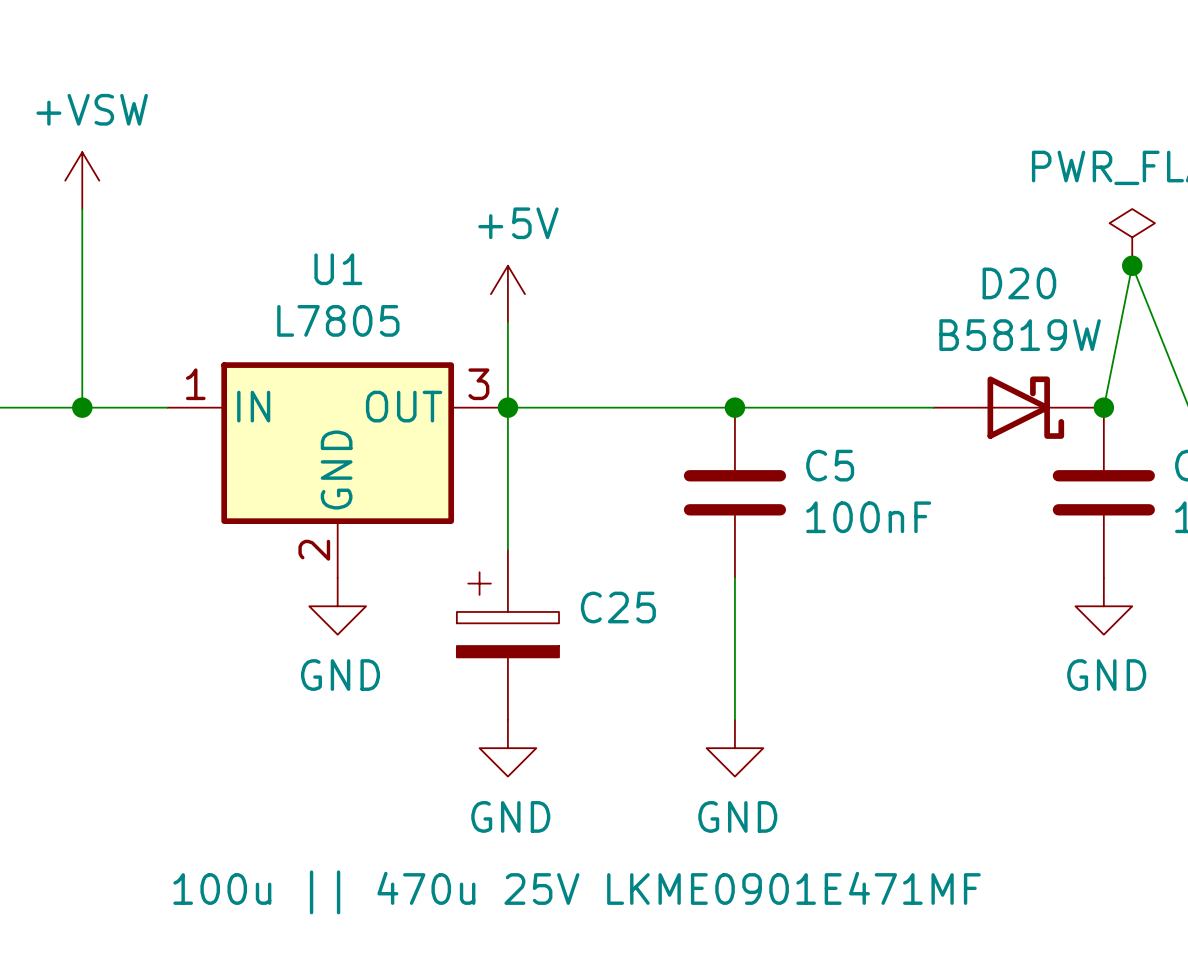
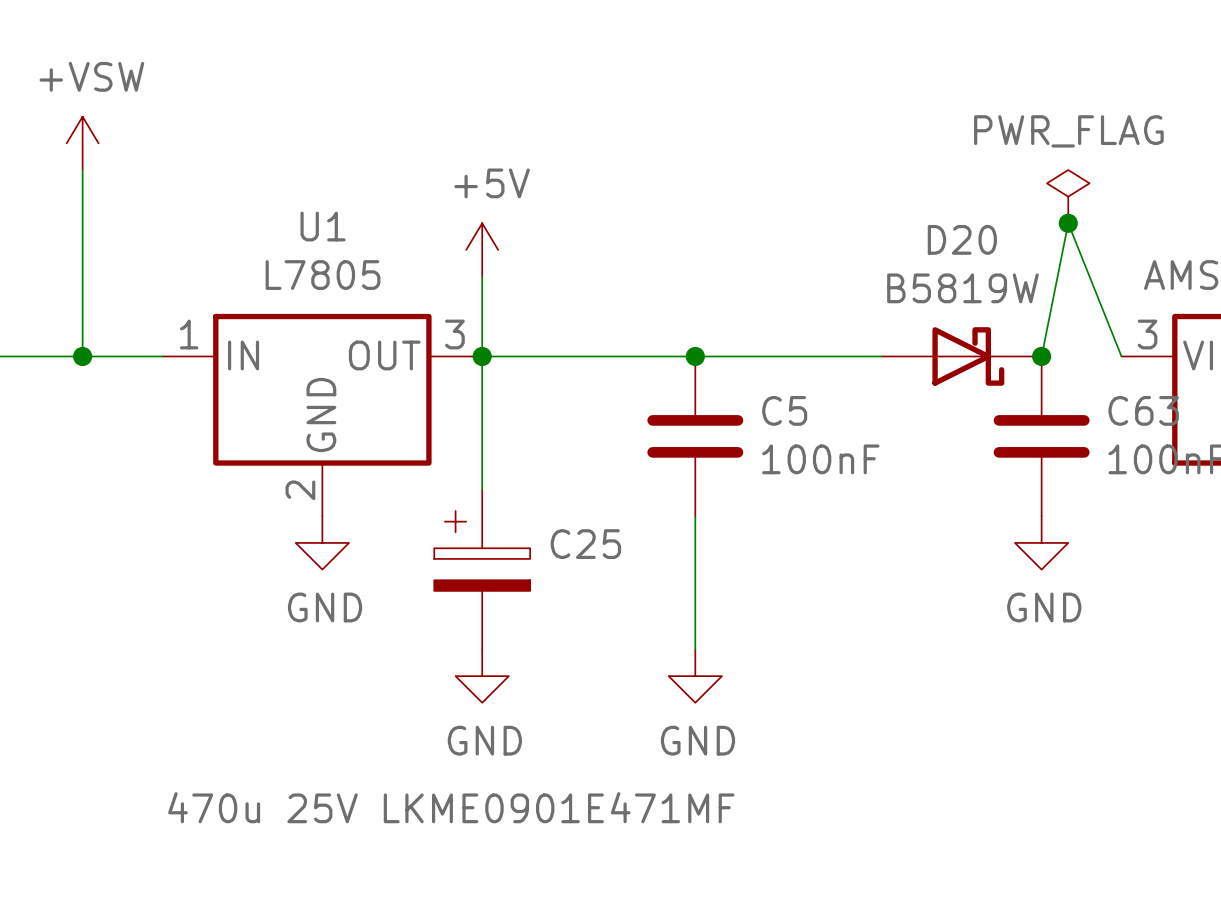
C25 value: 100u || 470u 25V LKME0901E471MF (577, 892) -> 470u 25V LKME0901E471MF (451, 807)

